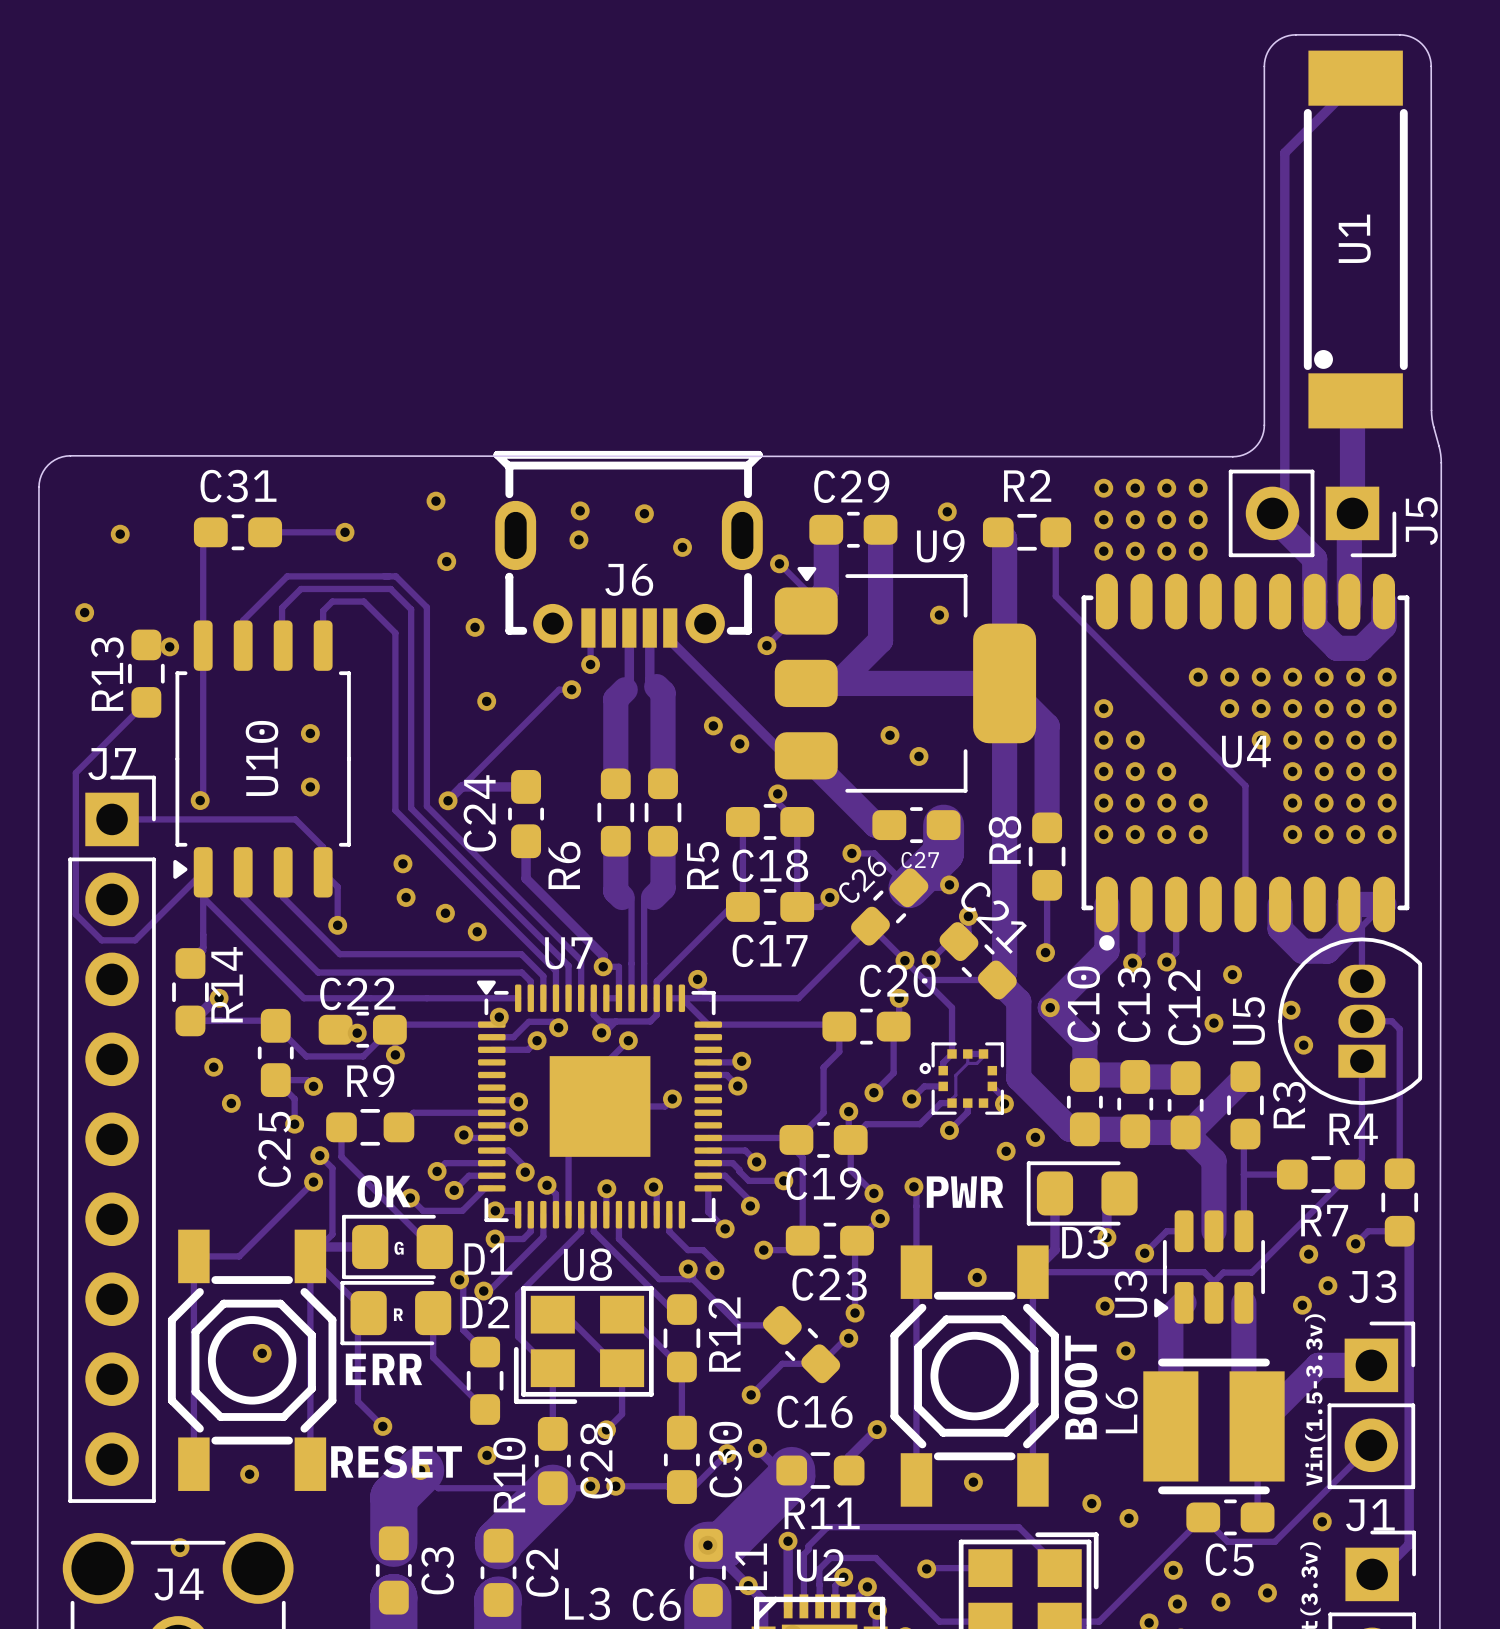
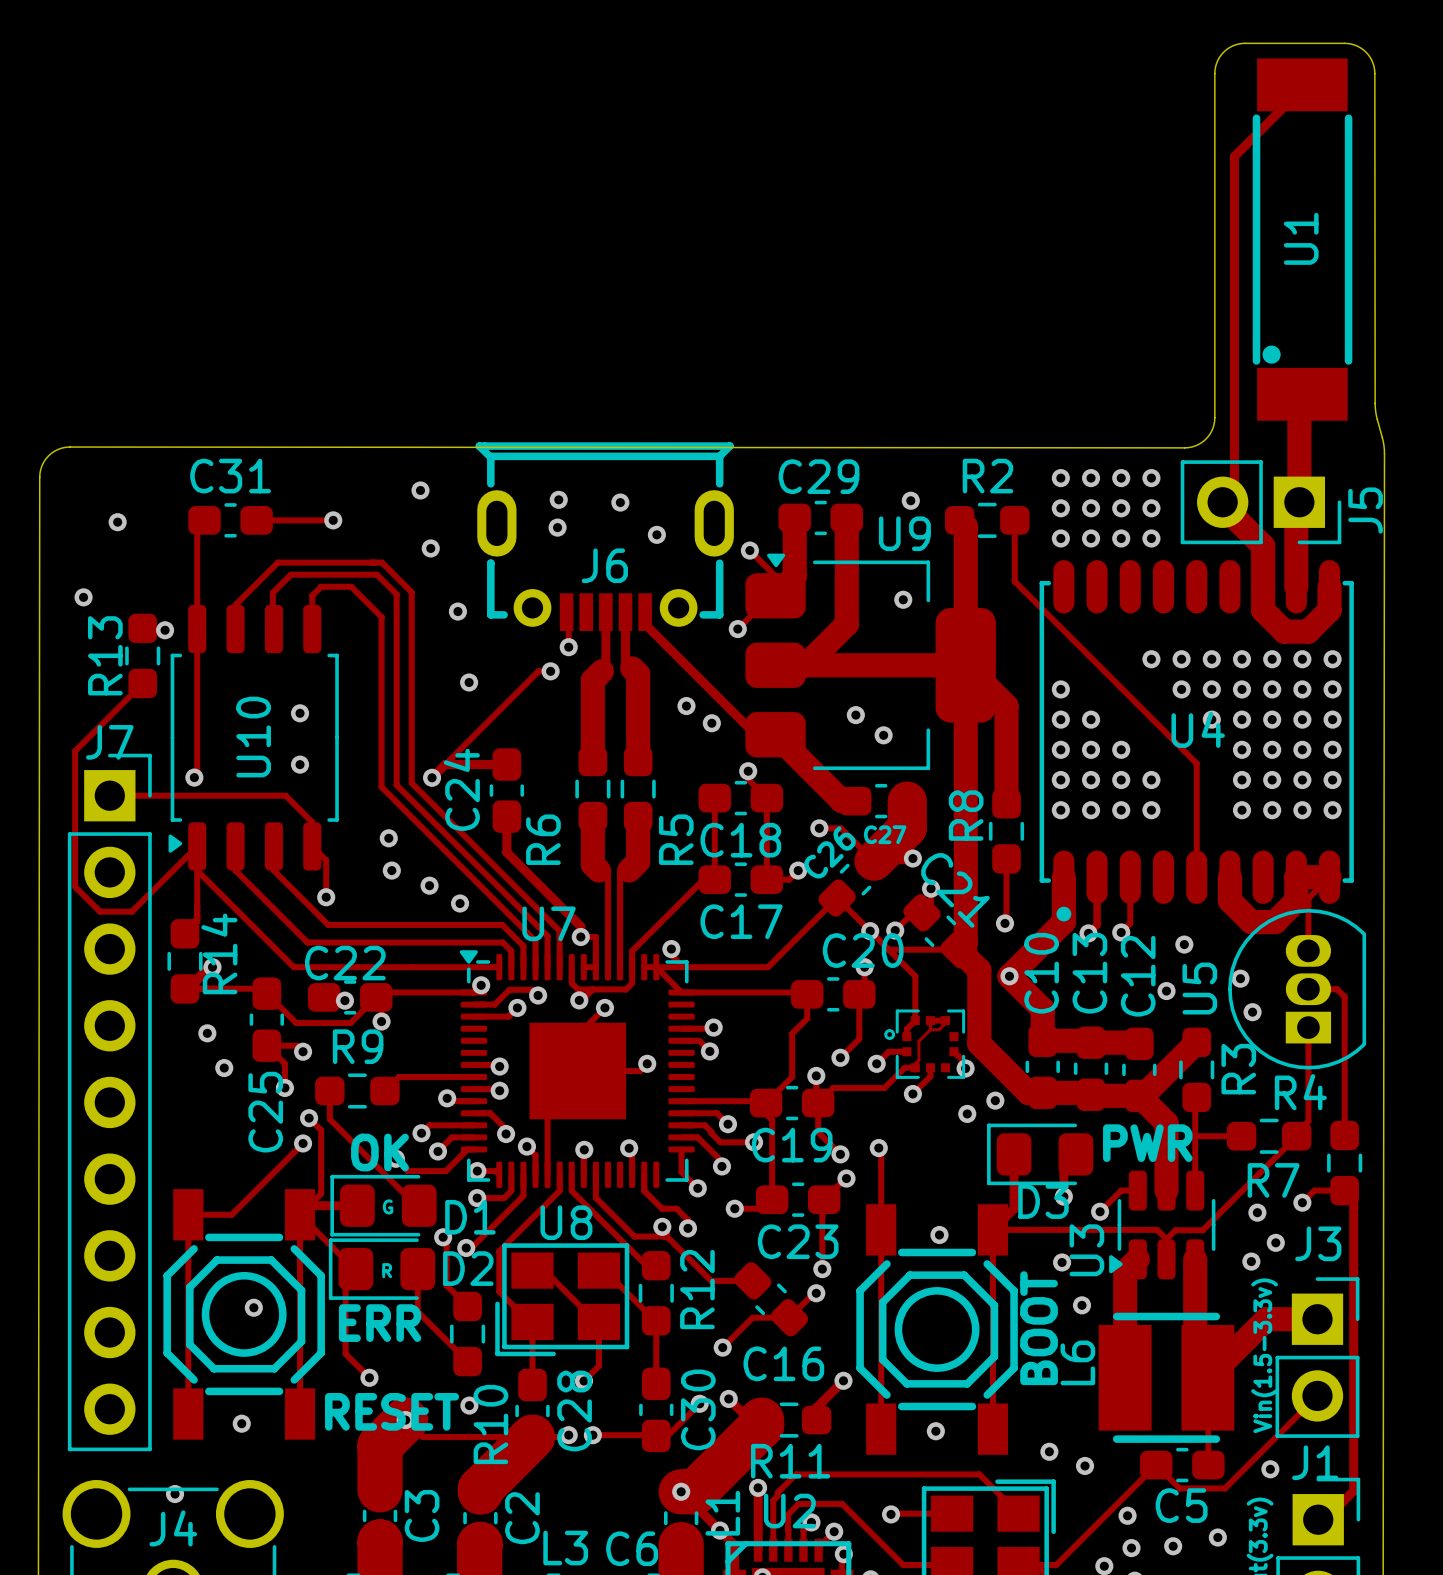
text position: PWR (965, 1192) -> PWR (1147, 1143)

